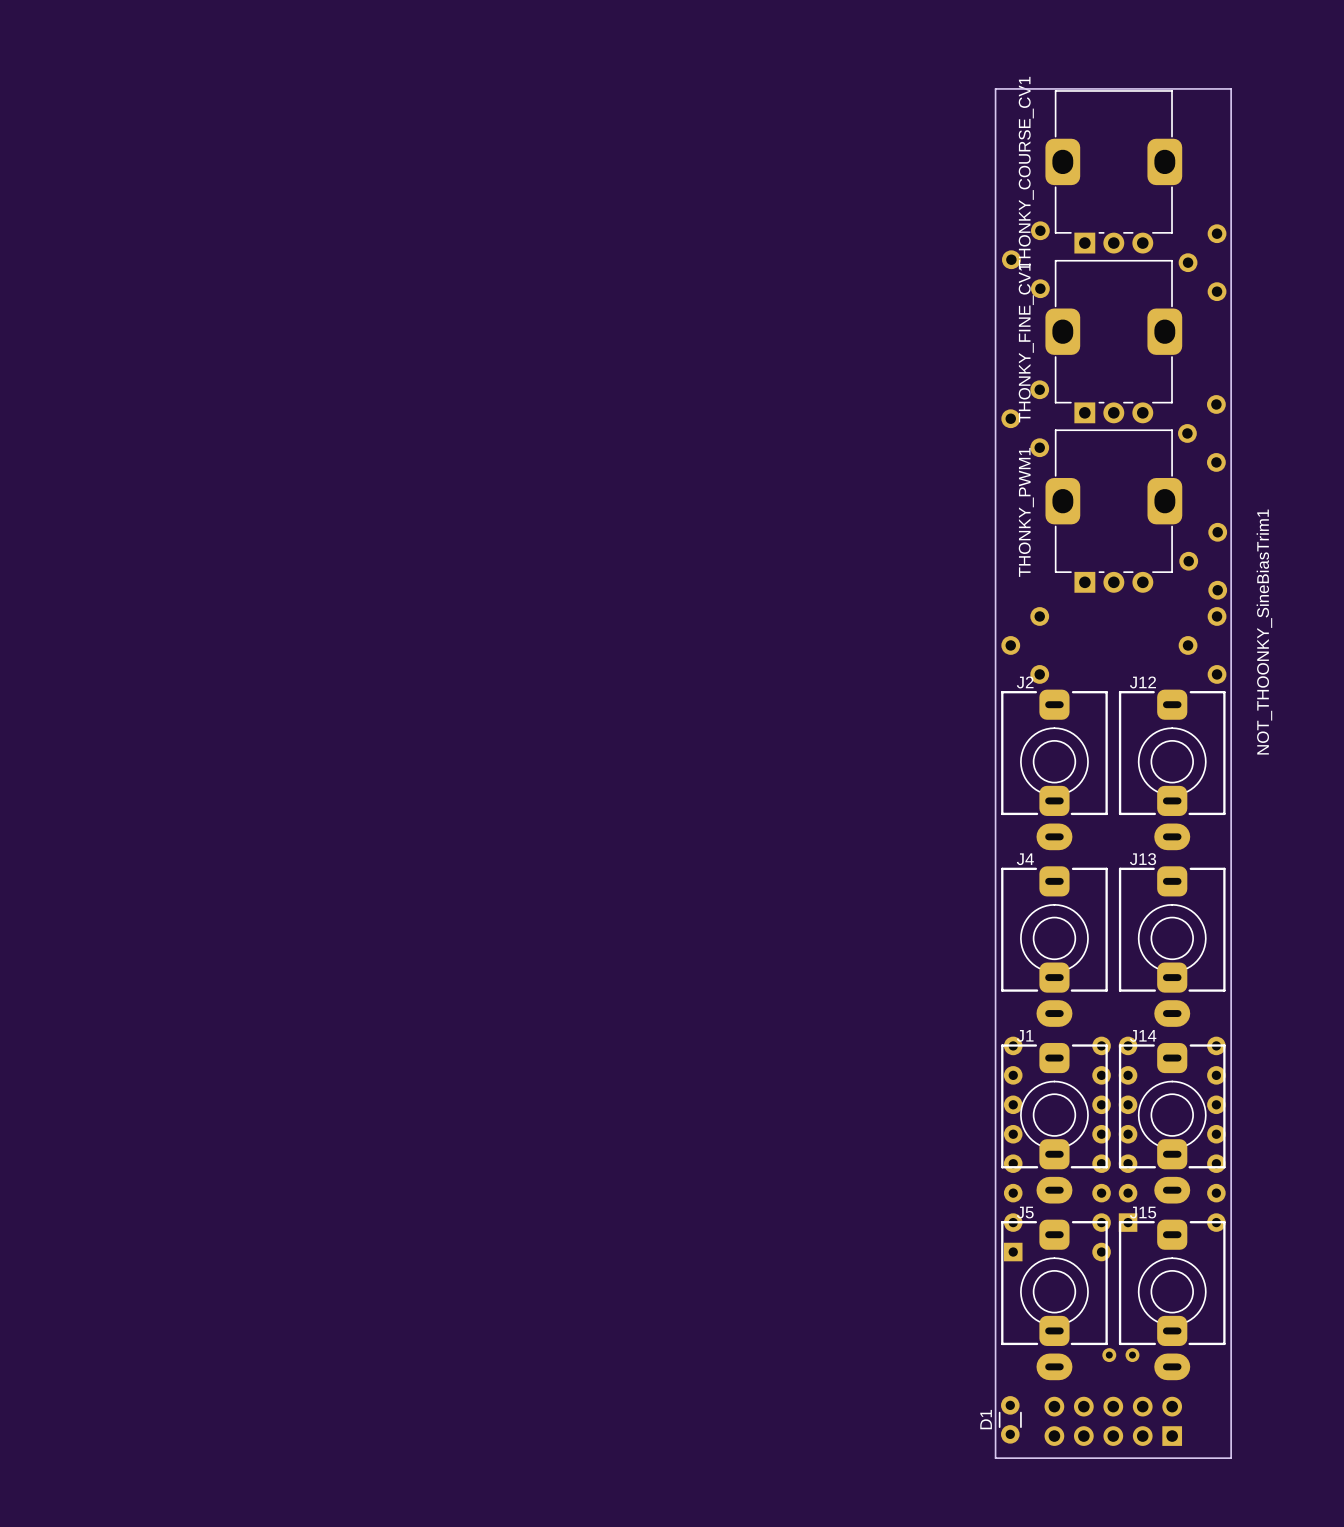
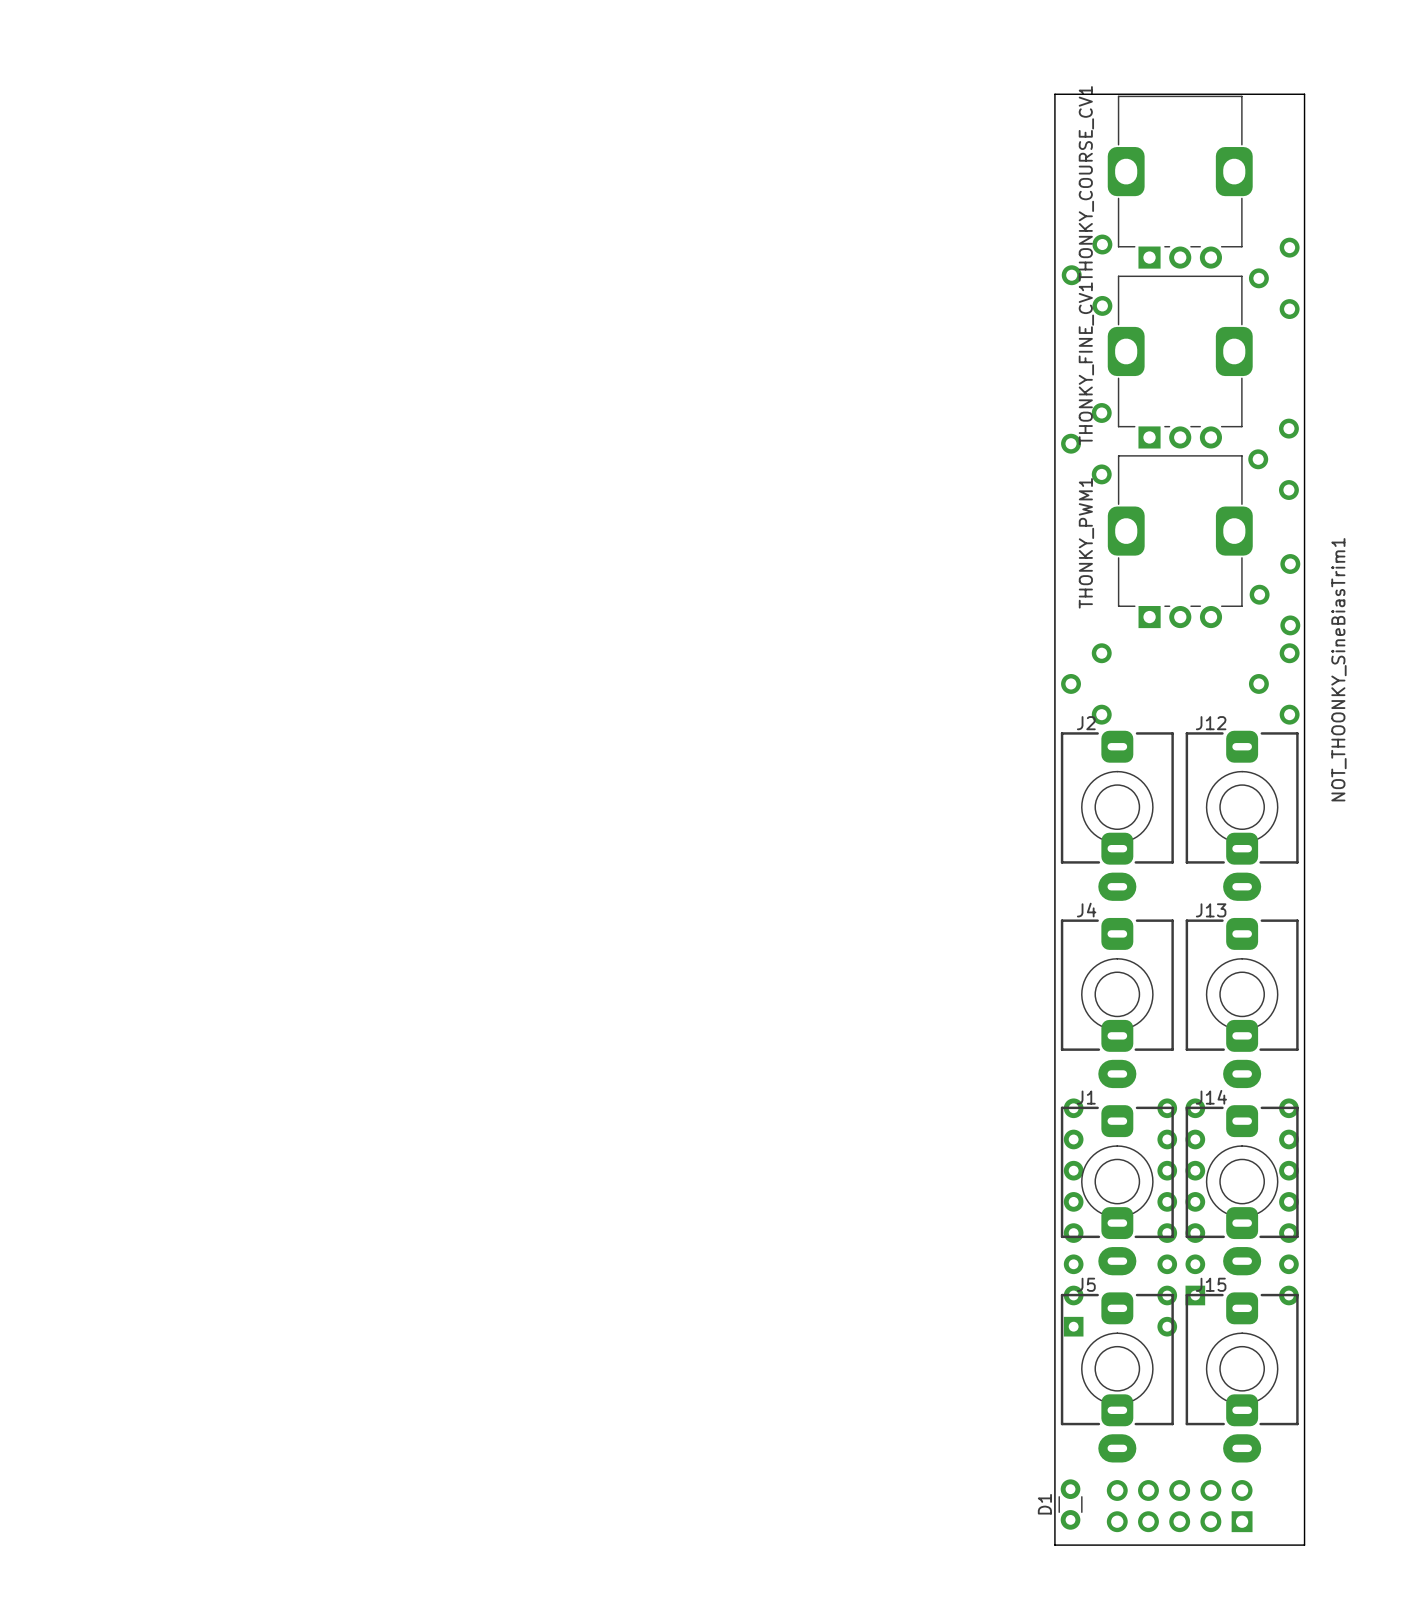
part: (1120, 1355) -> none

